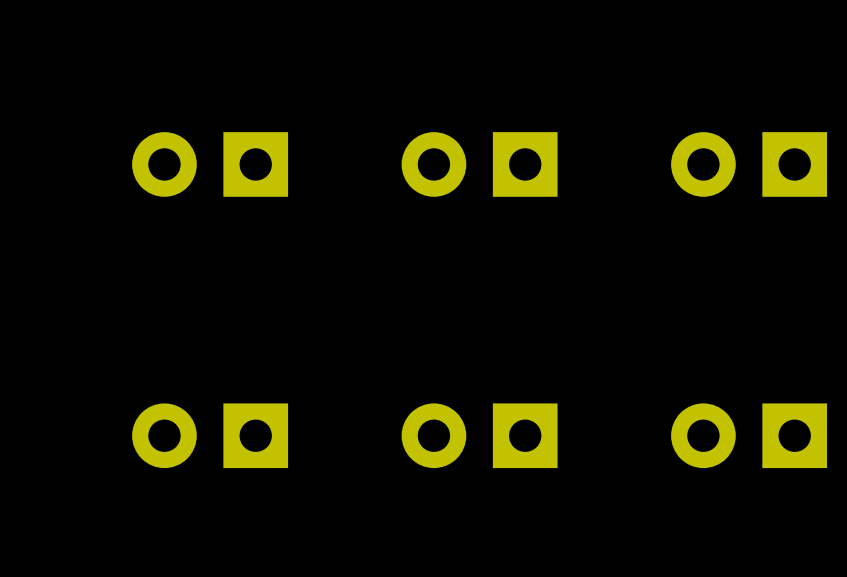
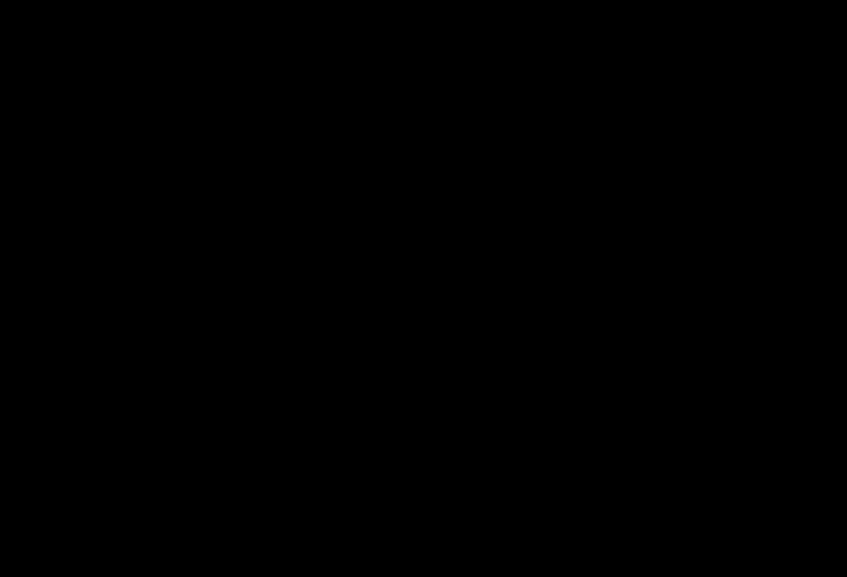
part: (210, 164) -> none
part: (479, 164) -> none
part: (749, 164) -> none
part: (210, 435) -> none
part: (479, 435) -> none
part: (749, 435) -> none

